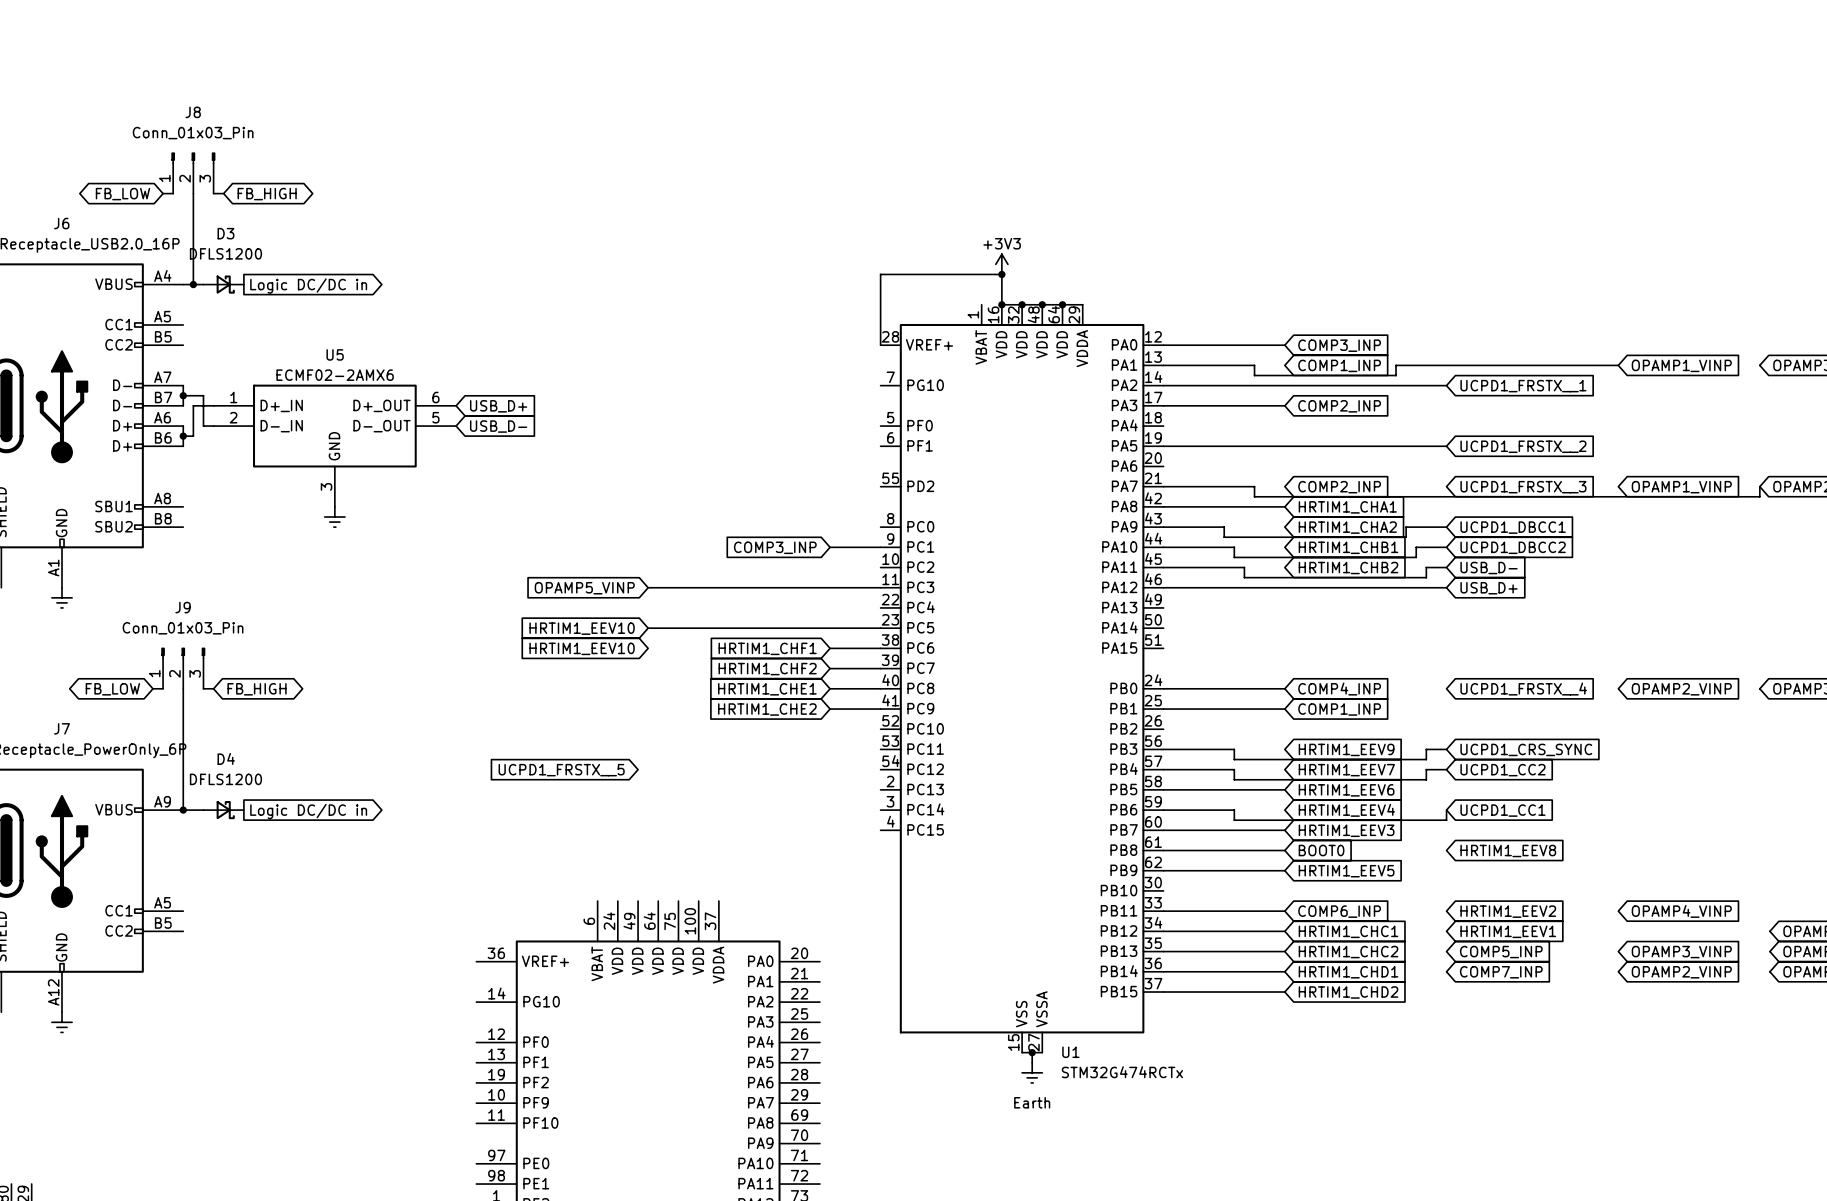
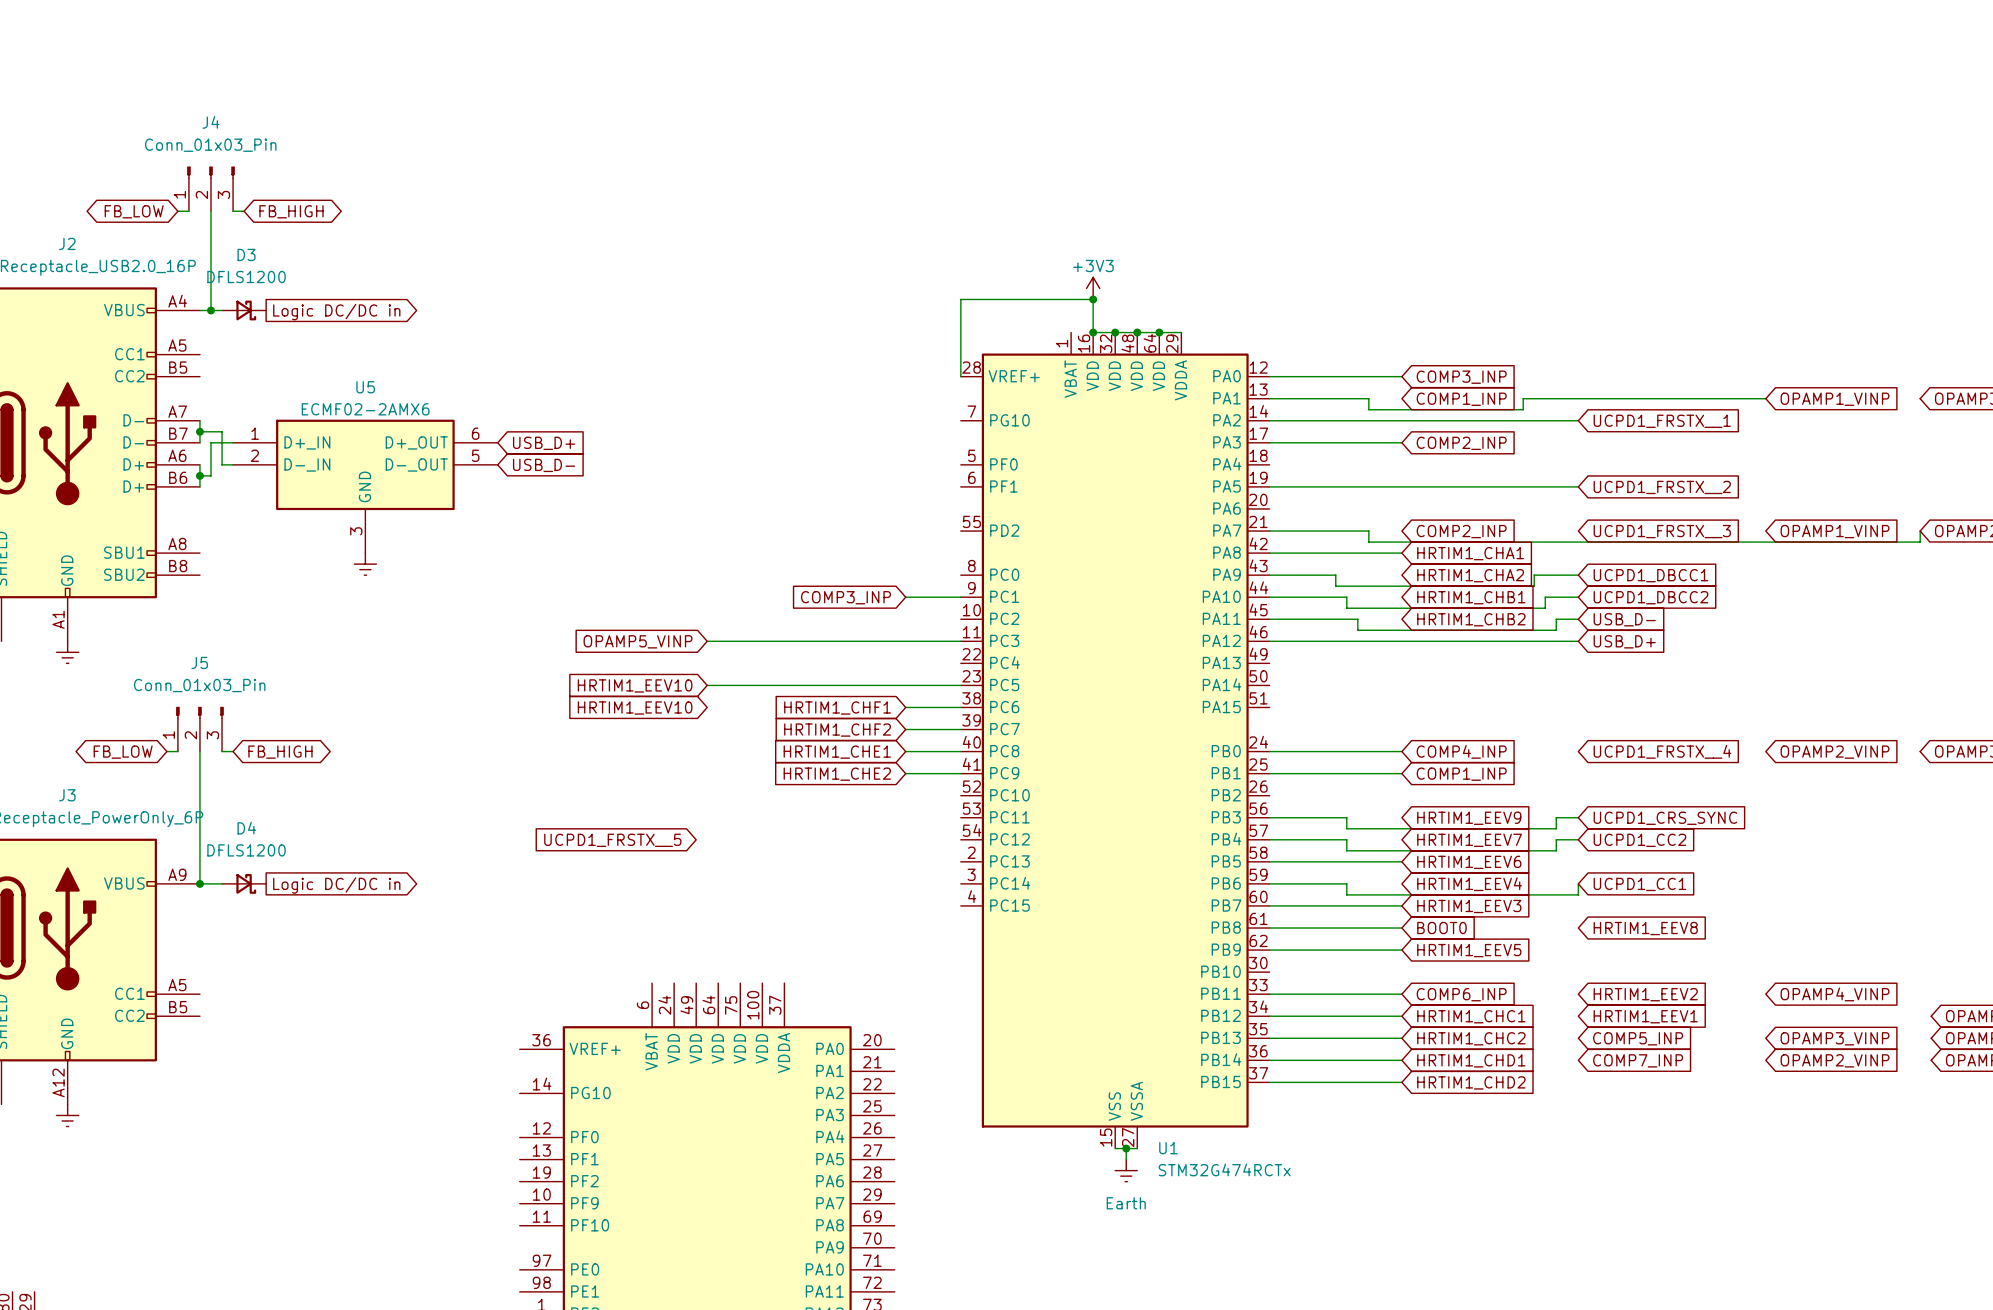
J8 name: J8 (193, 112) -> J4 (211, 122)
J6 name: J6 (61, 223) -> J2 (67, 243)
J9 name: J9 (183, 607) -> J5 (199, 662)
J7 name: J7 (62, 728) -> J3 (67, 795)

